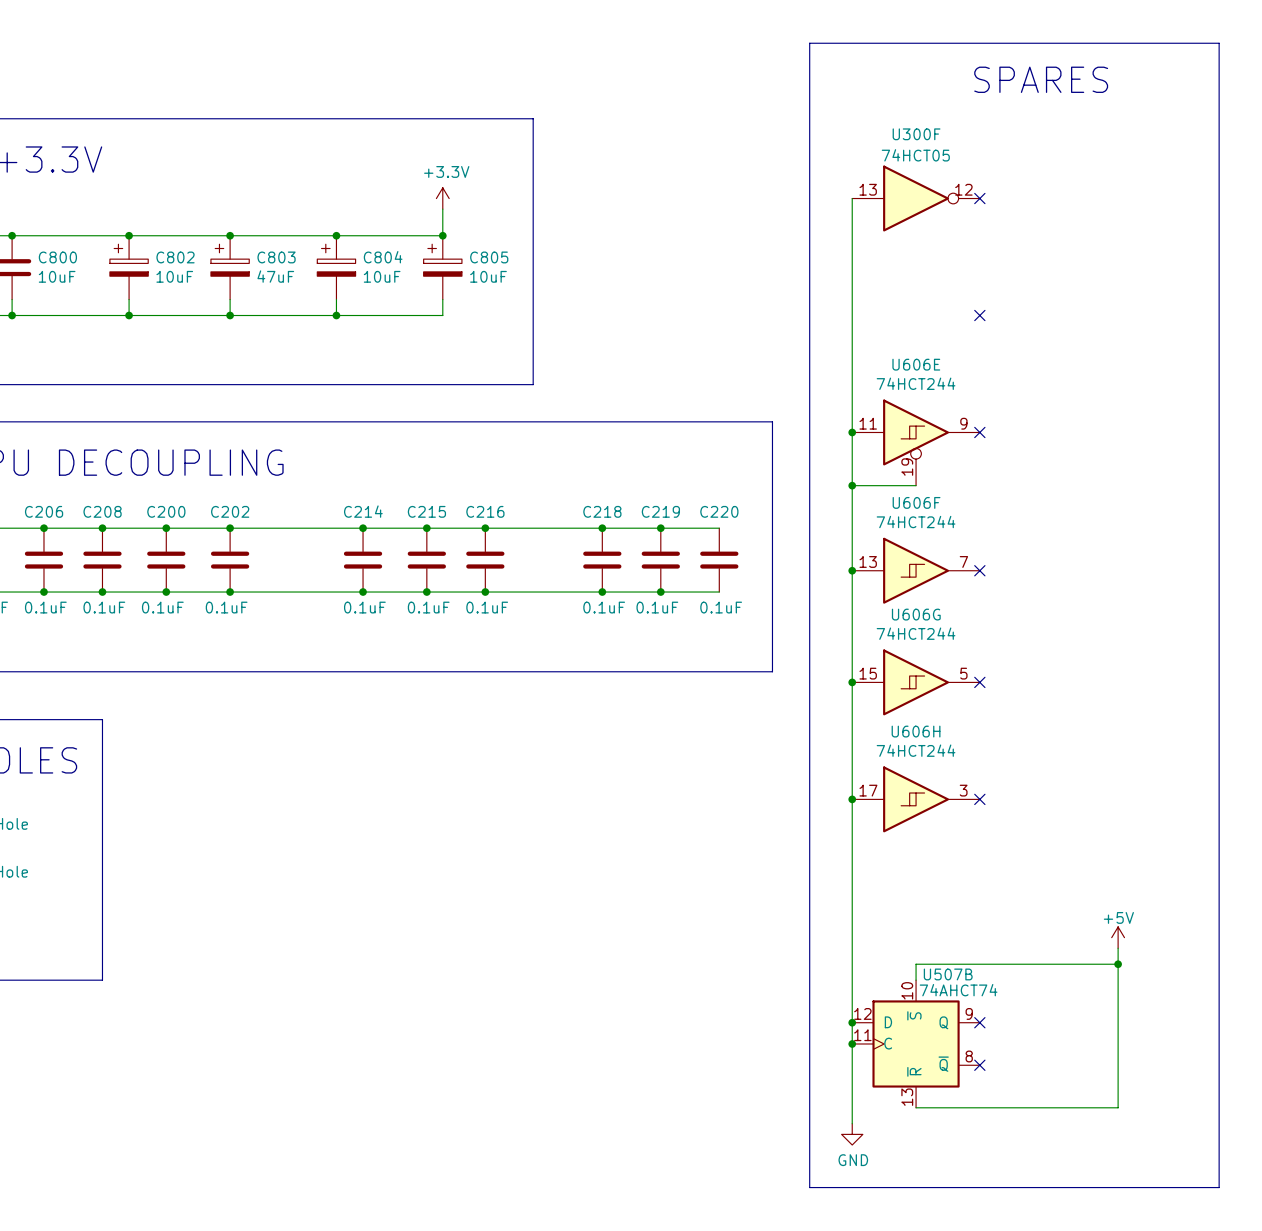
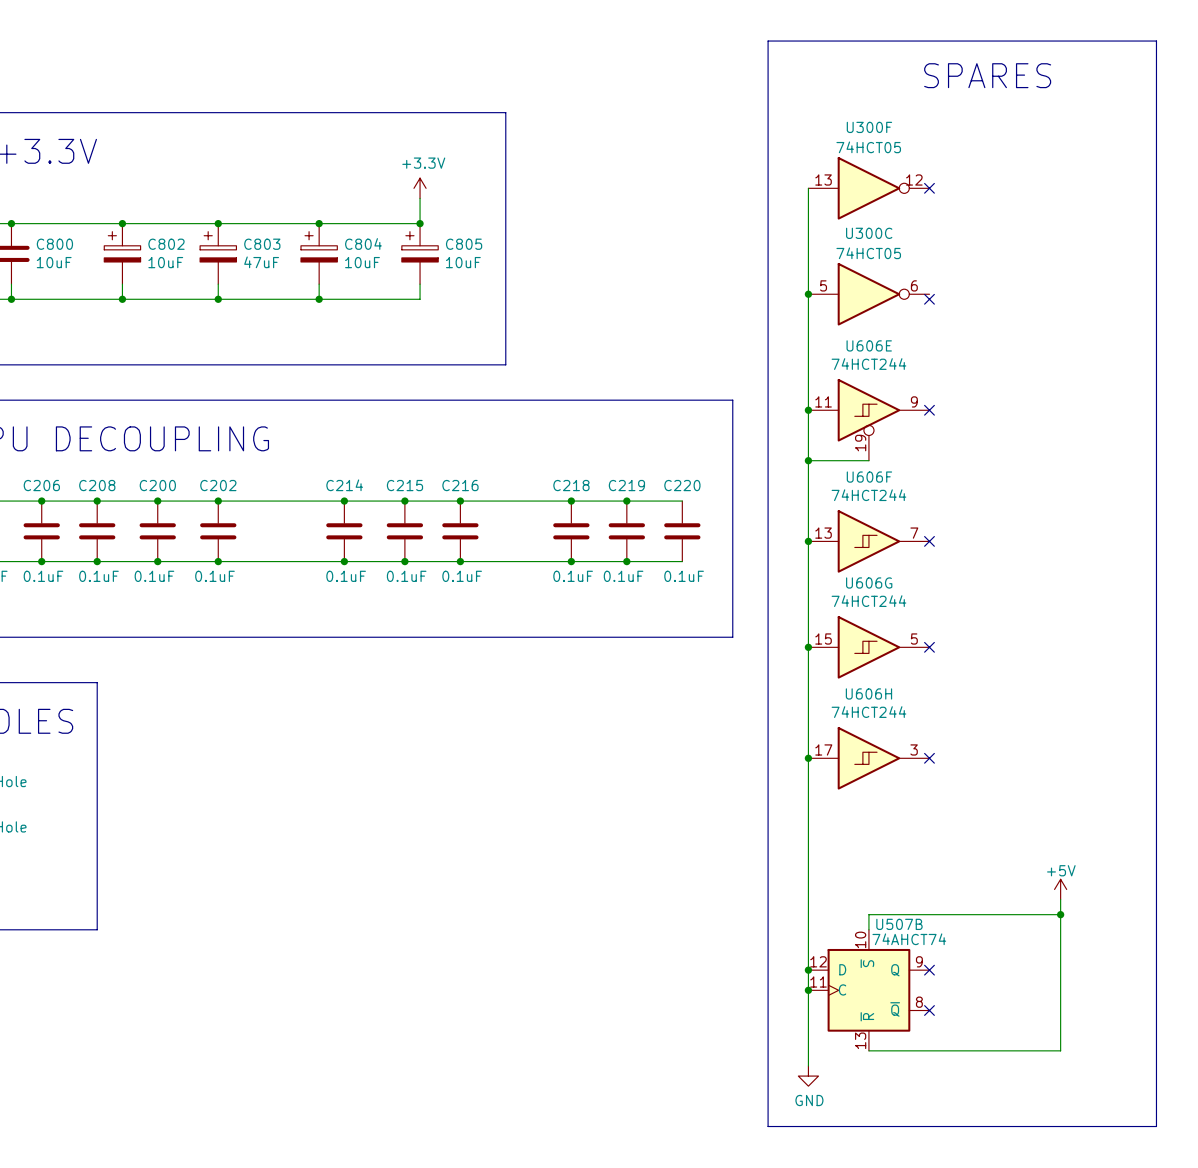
junction: none -> (808, 294)
U300C: none -> 74HCT05 (868, 294)

